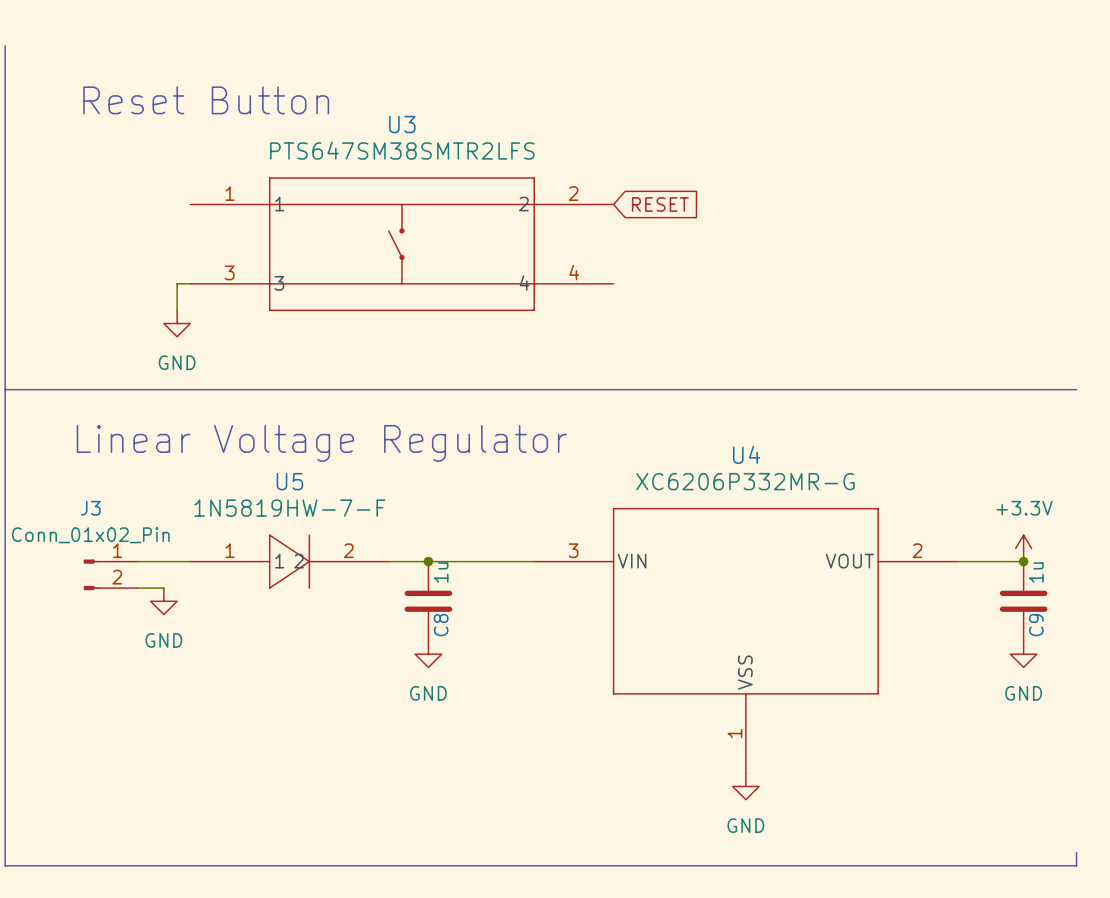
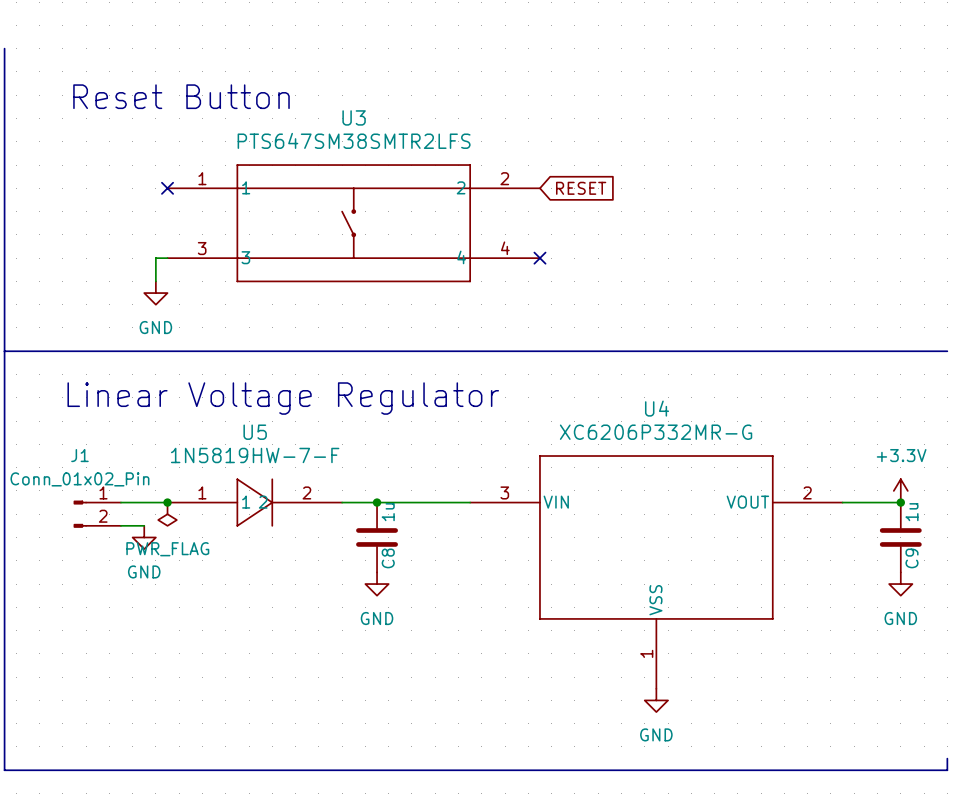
no-connect mark: none -> (167, 188)
no-connect mark: none -> (539, 258)
J3 name: J3 (90, 508) -> J1 (79, 455)
junction: none -> (167, 502)
power symbol: none -> PWR_FLAG (167, 514)

